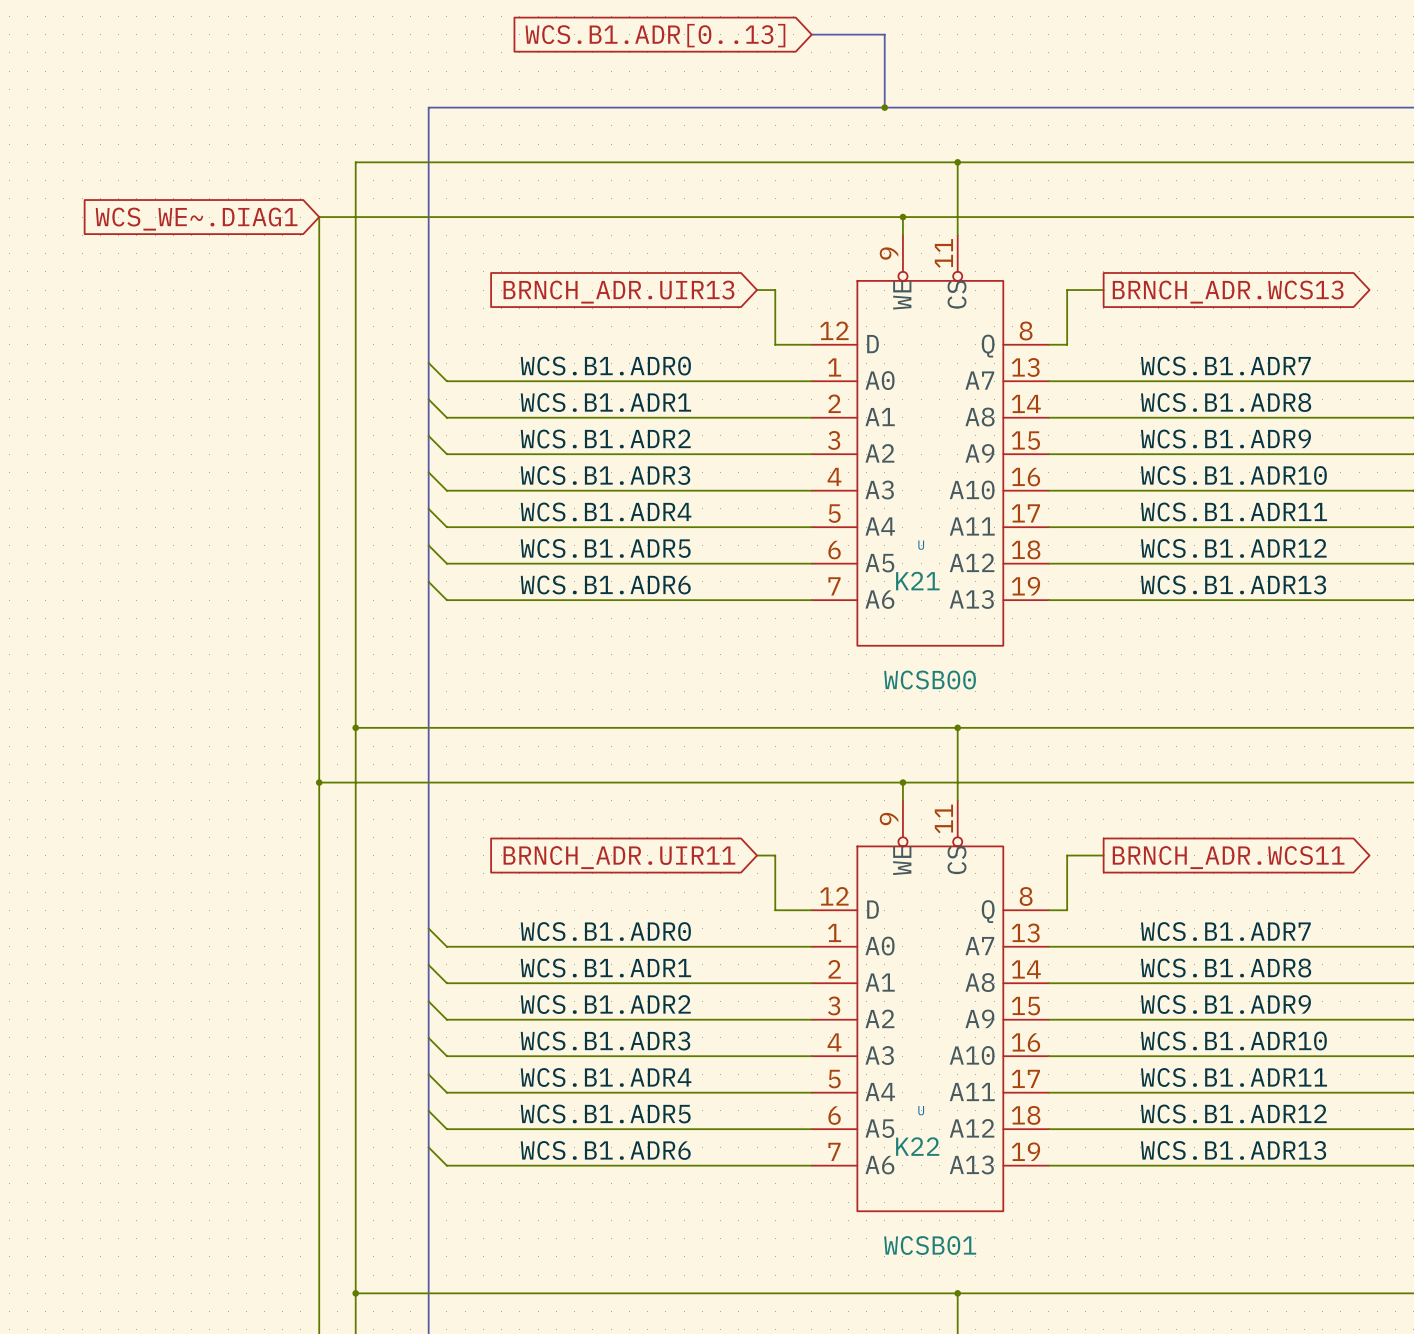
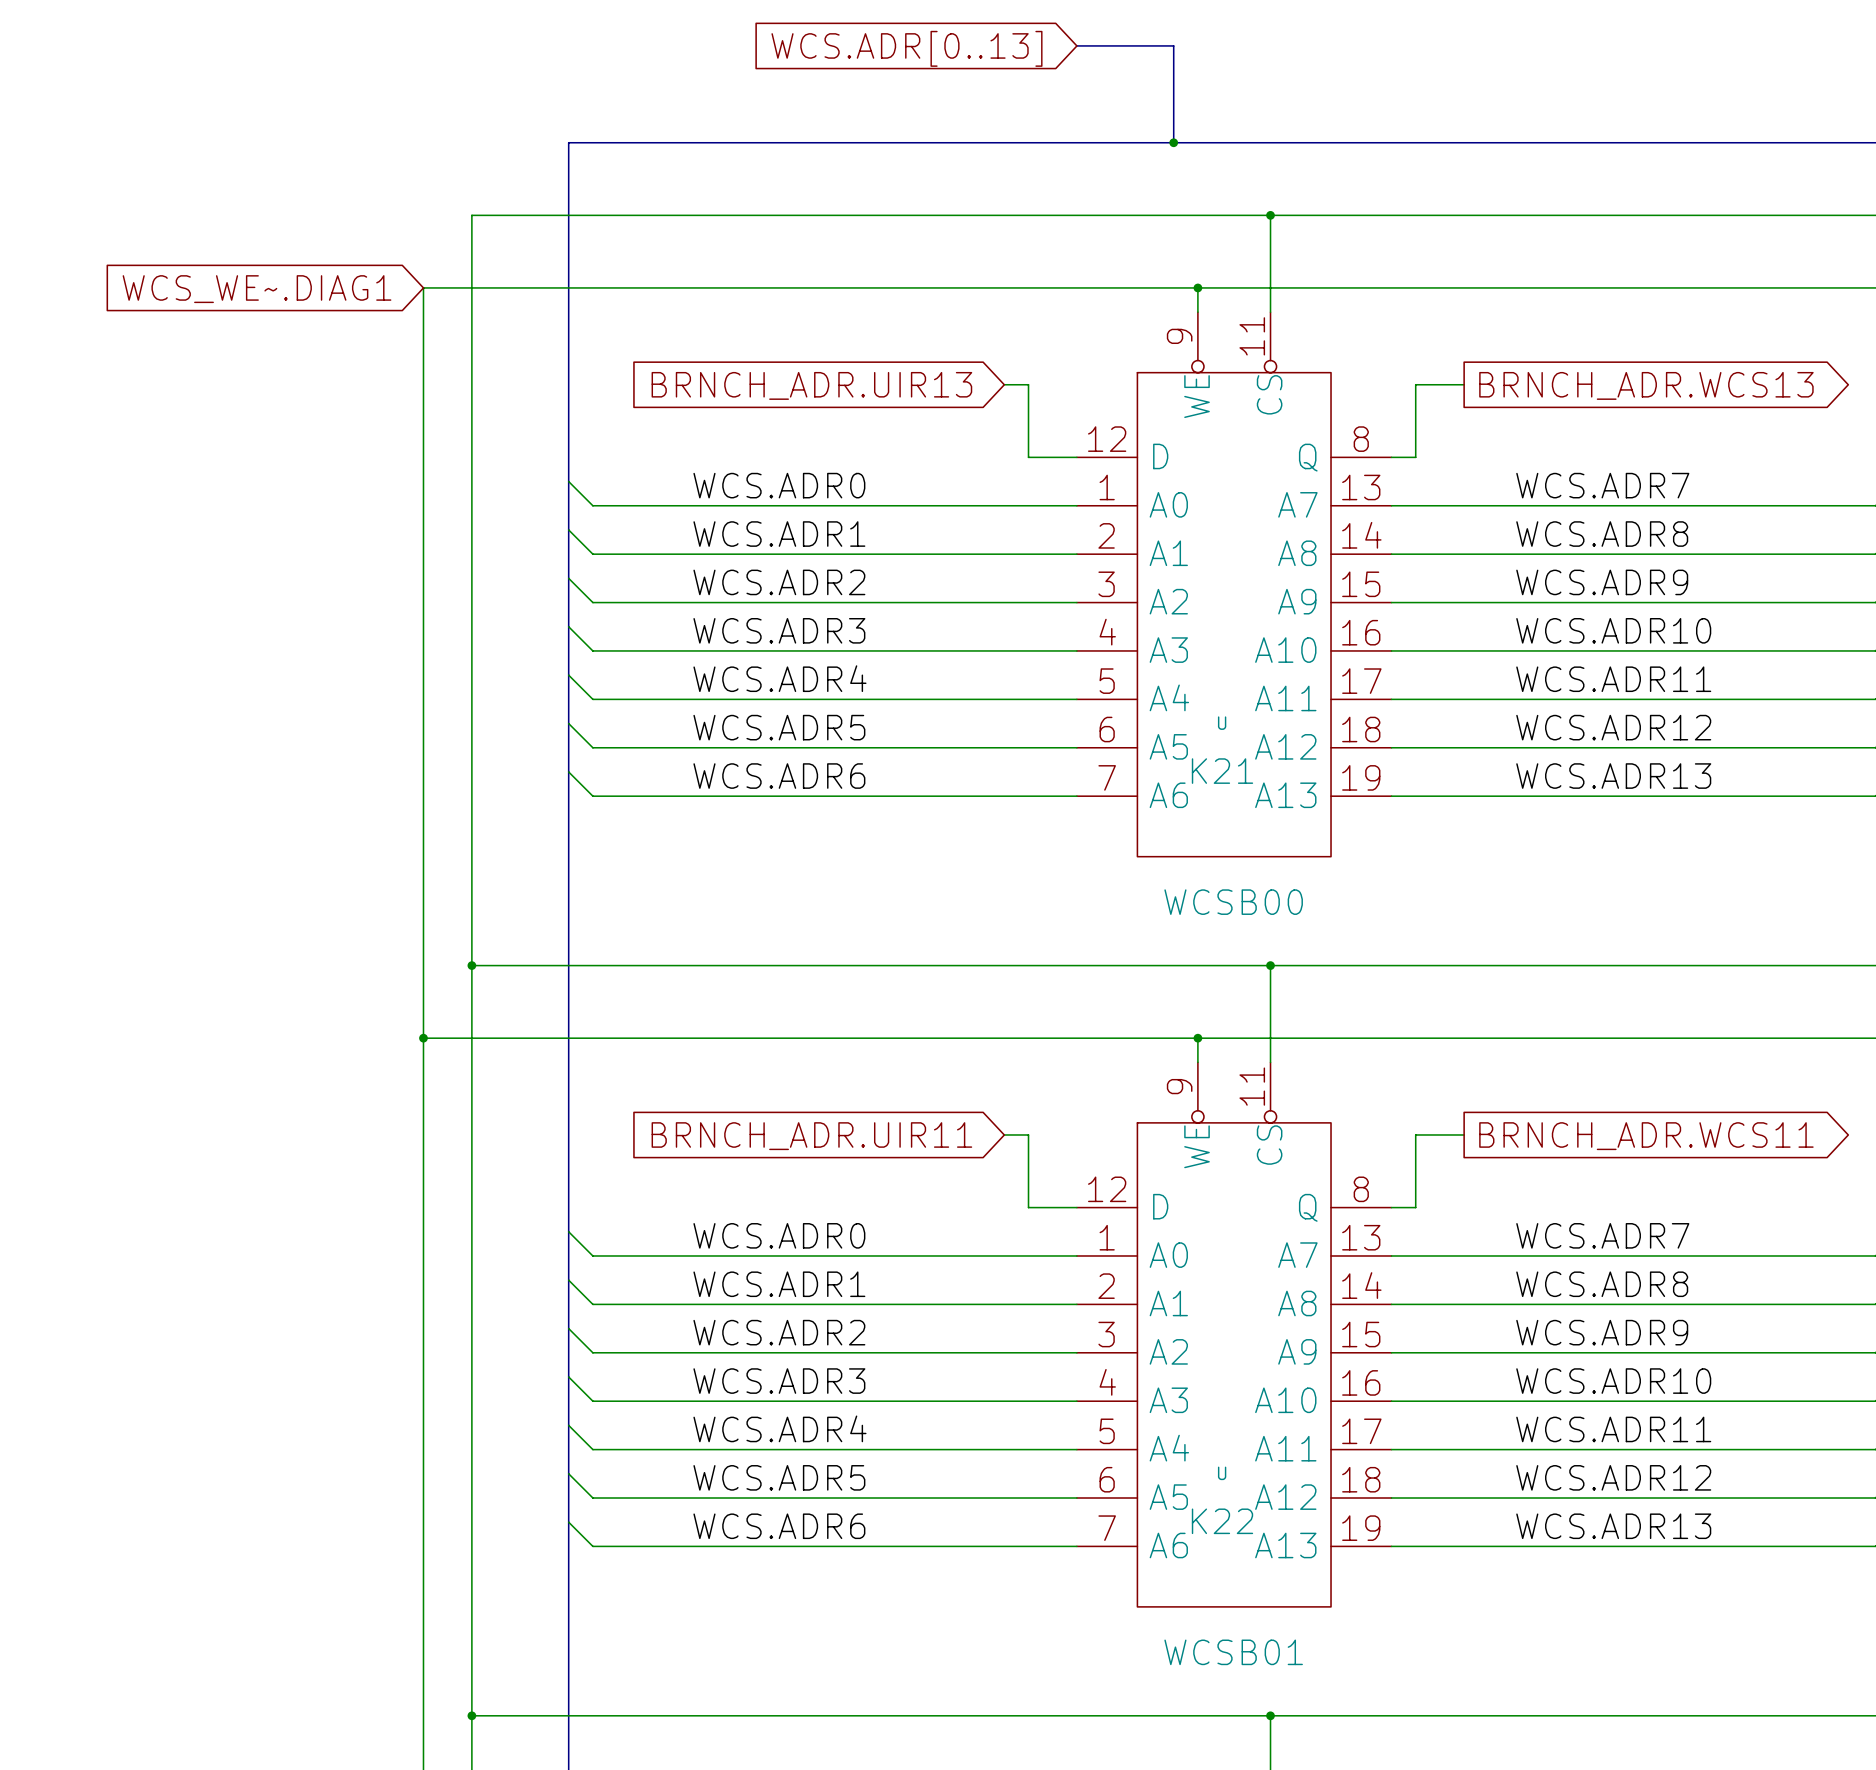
global label: WCS.B1.ADR[0..13] (655, 35) -> WCS.ADR[0..13] (906, 48)
label: WCS.B1.ADR0 (605, 366) -> WCS.ADR0 (779, 485)
label: WCS.B1.ADR7 (1225, 366) -> WCS.ADR7 (1602, 485)
label: WCS.B1.ADR1 (605, 402) -> WCS.ADR1 (779, 534)
label: WCS.B1.ADR8 (1226, 402) -> WCS.ADR8 (1602, 534)
label: WCS.B1.ADR2 (605, 439) -> WCS.ADR2 (779, 582)
label: WCS.B1.ADR9 (1225, 439) -> WCS.ADR9 (1602, 582)
label: WCS.B1.ADR3 (605, 475) -> WCS.ADR3 (779, 630)
label: WCS.B1.ADR10 (1233, 475) -> WCS.ADR10 (1613, 630)
label: WCS.B1.ADR4 (606, 511) -> WCS.ADR4 (779, 678)
label: WCS.B1.ADR11 (1234, 511) -> WCS.ADR11 (1613, 679)
label: WCS.B1.ADR5 (605, 548) -> WCS.ADR5 (779, 727)
label: WCS.B1.ADR12 (1233, 548) -> WCS.ADR12 (1613, 727)
label: WCS.B1.ADR6 (605, 584) -> WCS.ADR6 (779, 776)
label: WCS.B1.ADR13 (1233, 584) -> WCS.ADR13 (1613, 776)
label: WCS.B1.ADR0 (605, 931) -> WCS.ADR0 (779, 1235)
label: WCS.B1.ADR7 (1225, 931) -> WCS.ADR7 (1602, 1235)
label: WCS.B1.ADR1 (605, 968) -> WCS.ADR1 (779, 1284)
label: WCS.B1.ADR8 (1226, 968) -> WCS.ADR8 (1602, 1284)
label: WCS.B1.ADR2 (605, 1004) -> WCS.ADR2 (779, 1332)
label: WCS.B1.ADR9 (1225, 1004) -> WCS.ADR9 (1602, 1332)
label: WCS.B1.ADR3 (605, 1041) -> WCS.ADR3 (779, 1381)
label: WCS.B1.ADR10 (1233, 1041) -> WCS.ADR10 (1613, 1381)
label: WCS.B1.ADR4 (606, 1077) -> WCS.ADR4 (779, 1428)
label: WCS.B1.ADR11 (1234, 1077) -> WCS.ADR11 (1613, 1429)
label: WCS.B1.ADR5 (605, 1113) -> WCS.ADR5 (779, 1477)
label: WCS.B1.ADR12 (1233, 1113) -> WCS.ADR12 (1613, 1477)
label: WCS.B1.ADR6 (605, 1150) -> WCS.ADR6 (779, 1526)
label: WCS.B1.ADR13 (1233, 1150) -> WCS.ADR13 (1613, 1526)

